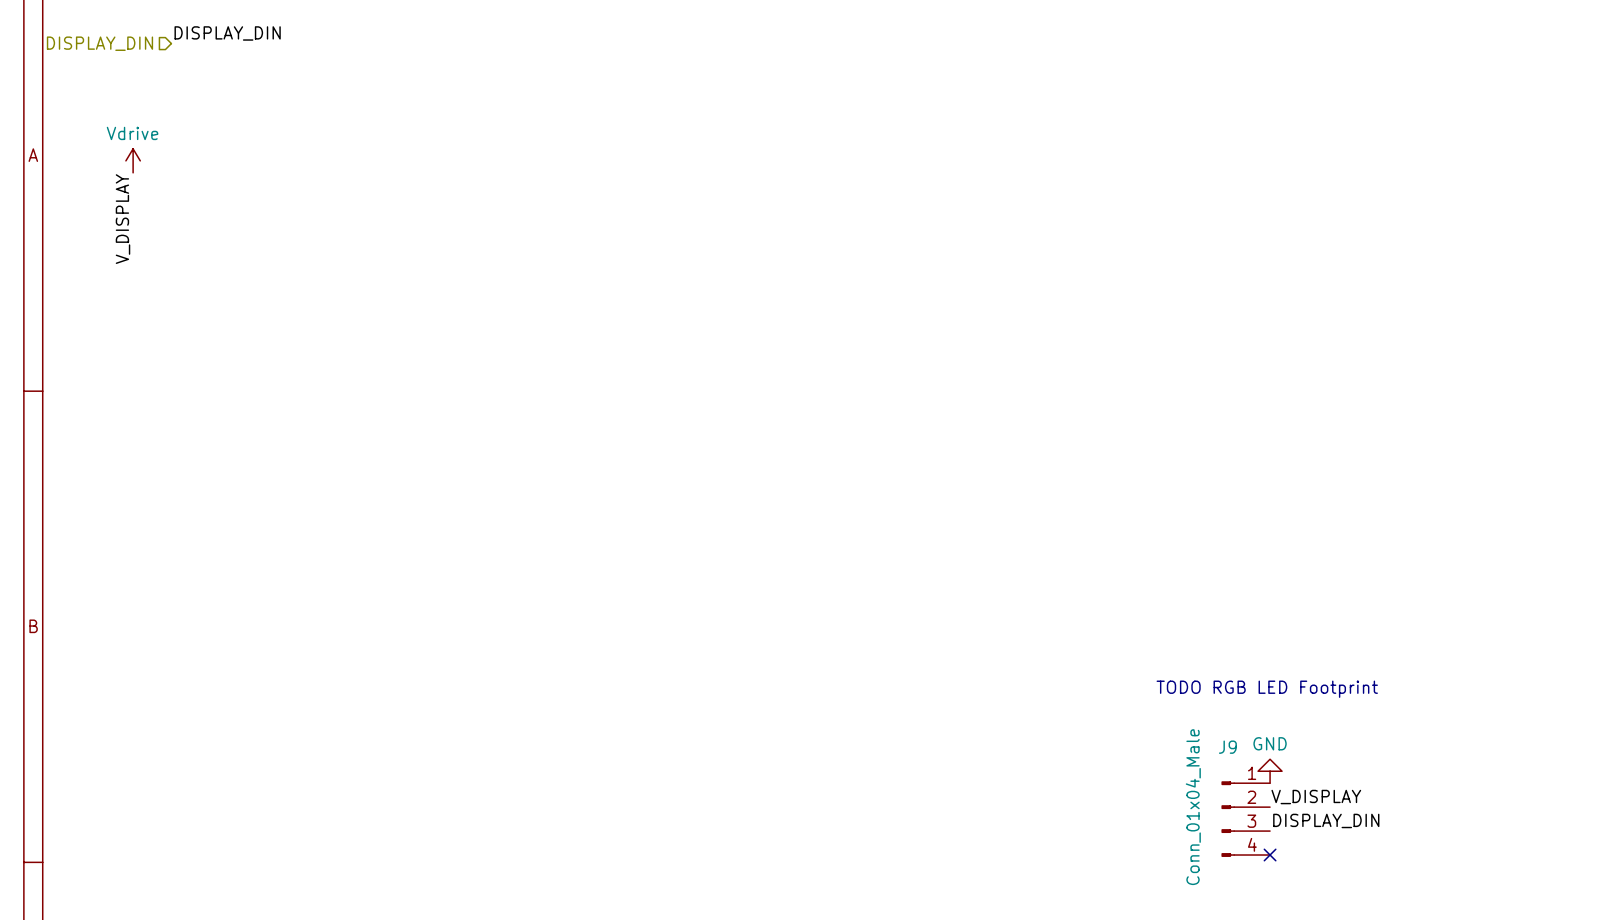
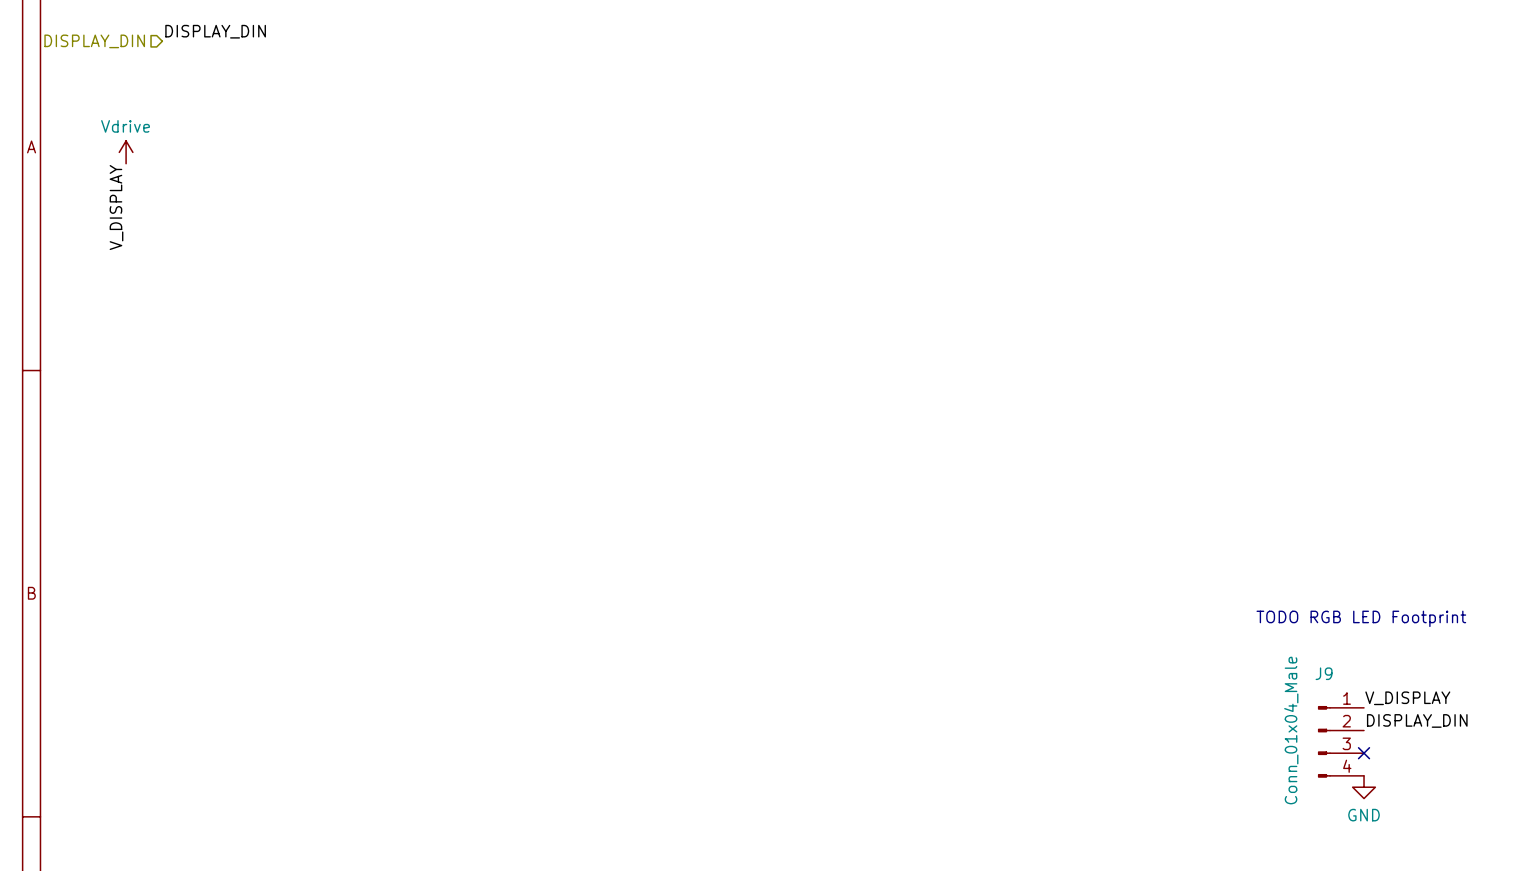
text position: TODO RGB LED Footprint (1267, 689) -> TODO RGB LED Footprint (1361, 618)
power symbol rotation: 0° (1270, 771) -> 180° (1364, 787)
power symbol position: GND (1270, 771) -> GND (1364, 787)
no-connect mark: none -> (1364, 753)
label position: V_DISPLAY (1316, 797) -> V_DISPLAY (1407, 698)
J9 position: (1245, 819) -> (1340, 741)
label position: DISPLAY_DIN (1326, 820) -> DISPLAY_DIN (1417, 720)
no-connect mark: (1270, 855) -> none

